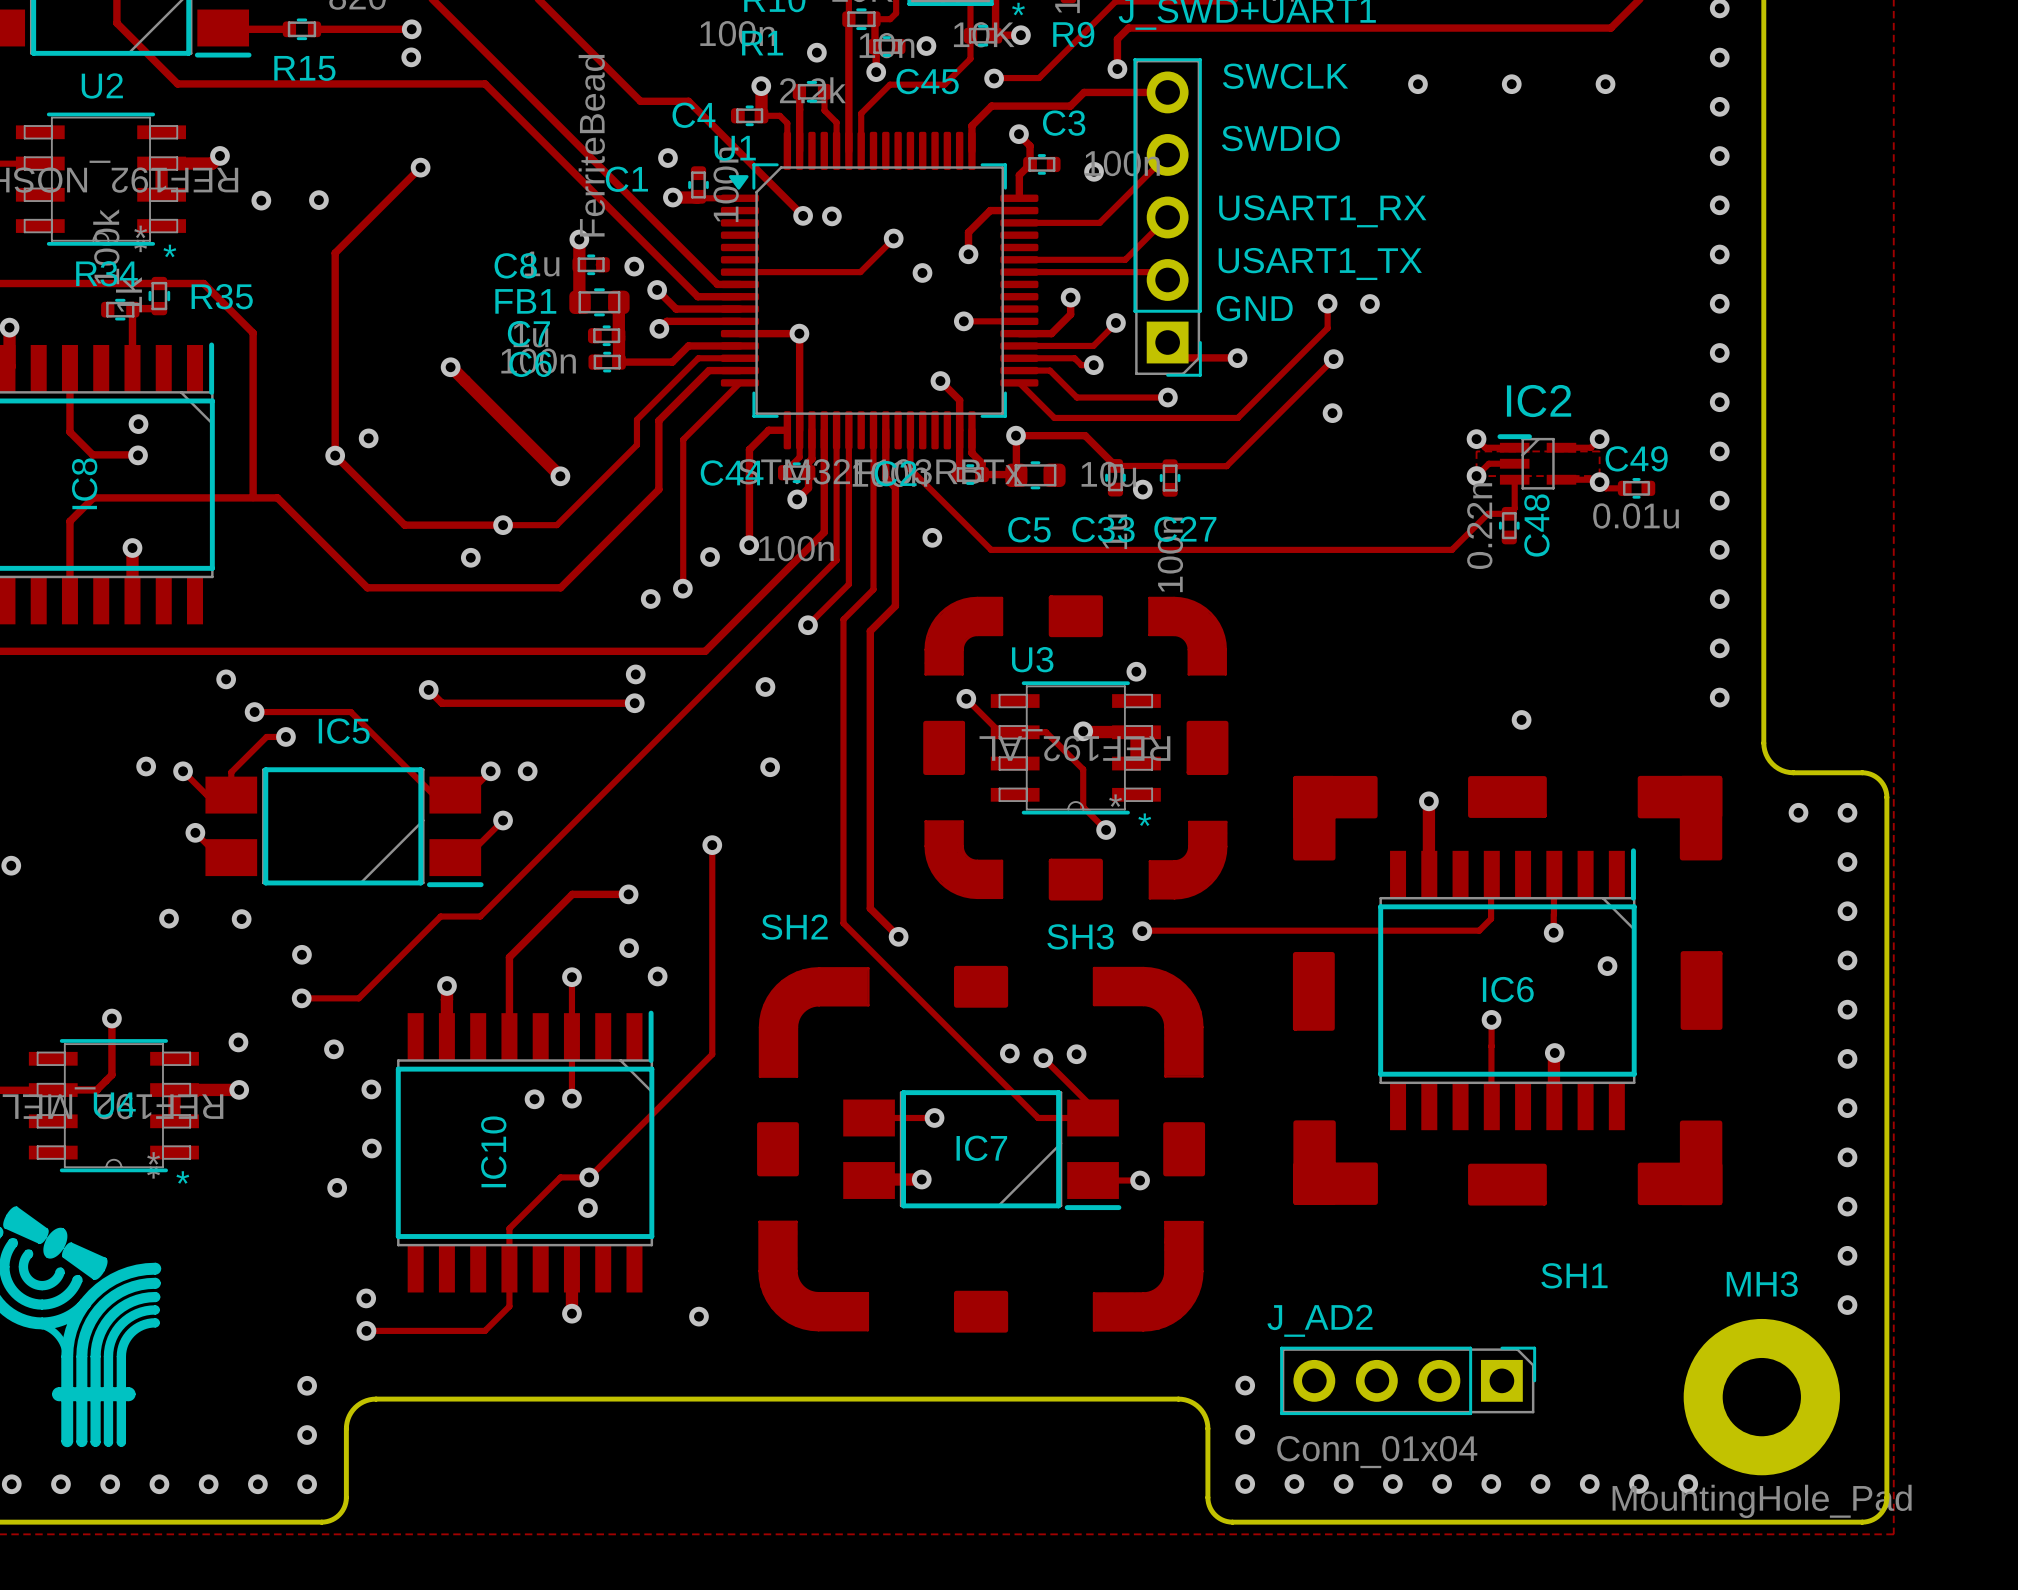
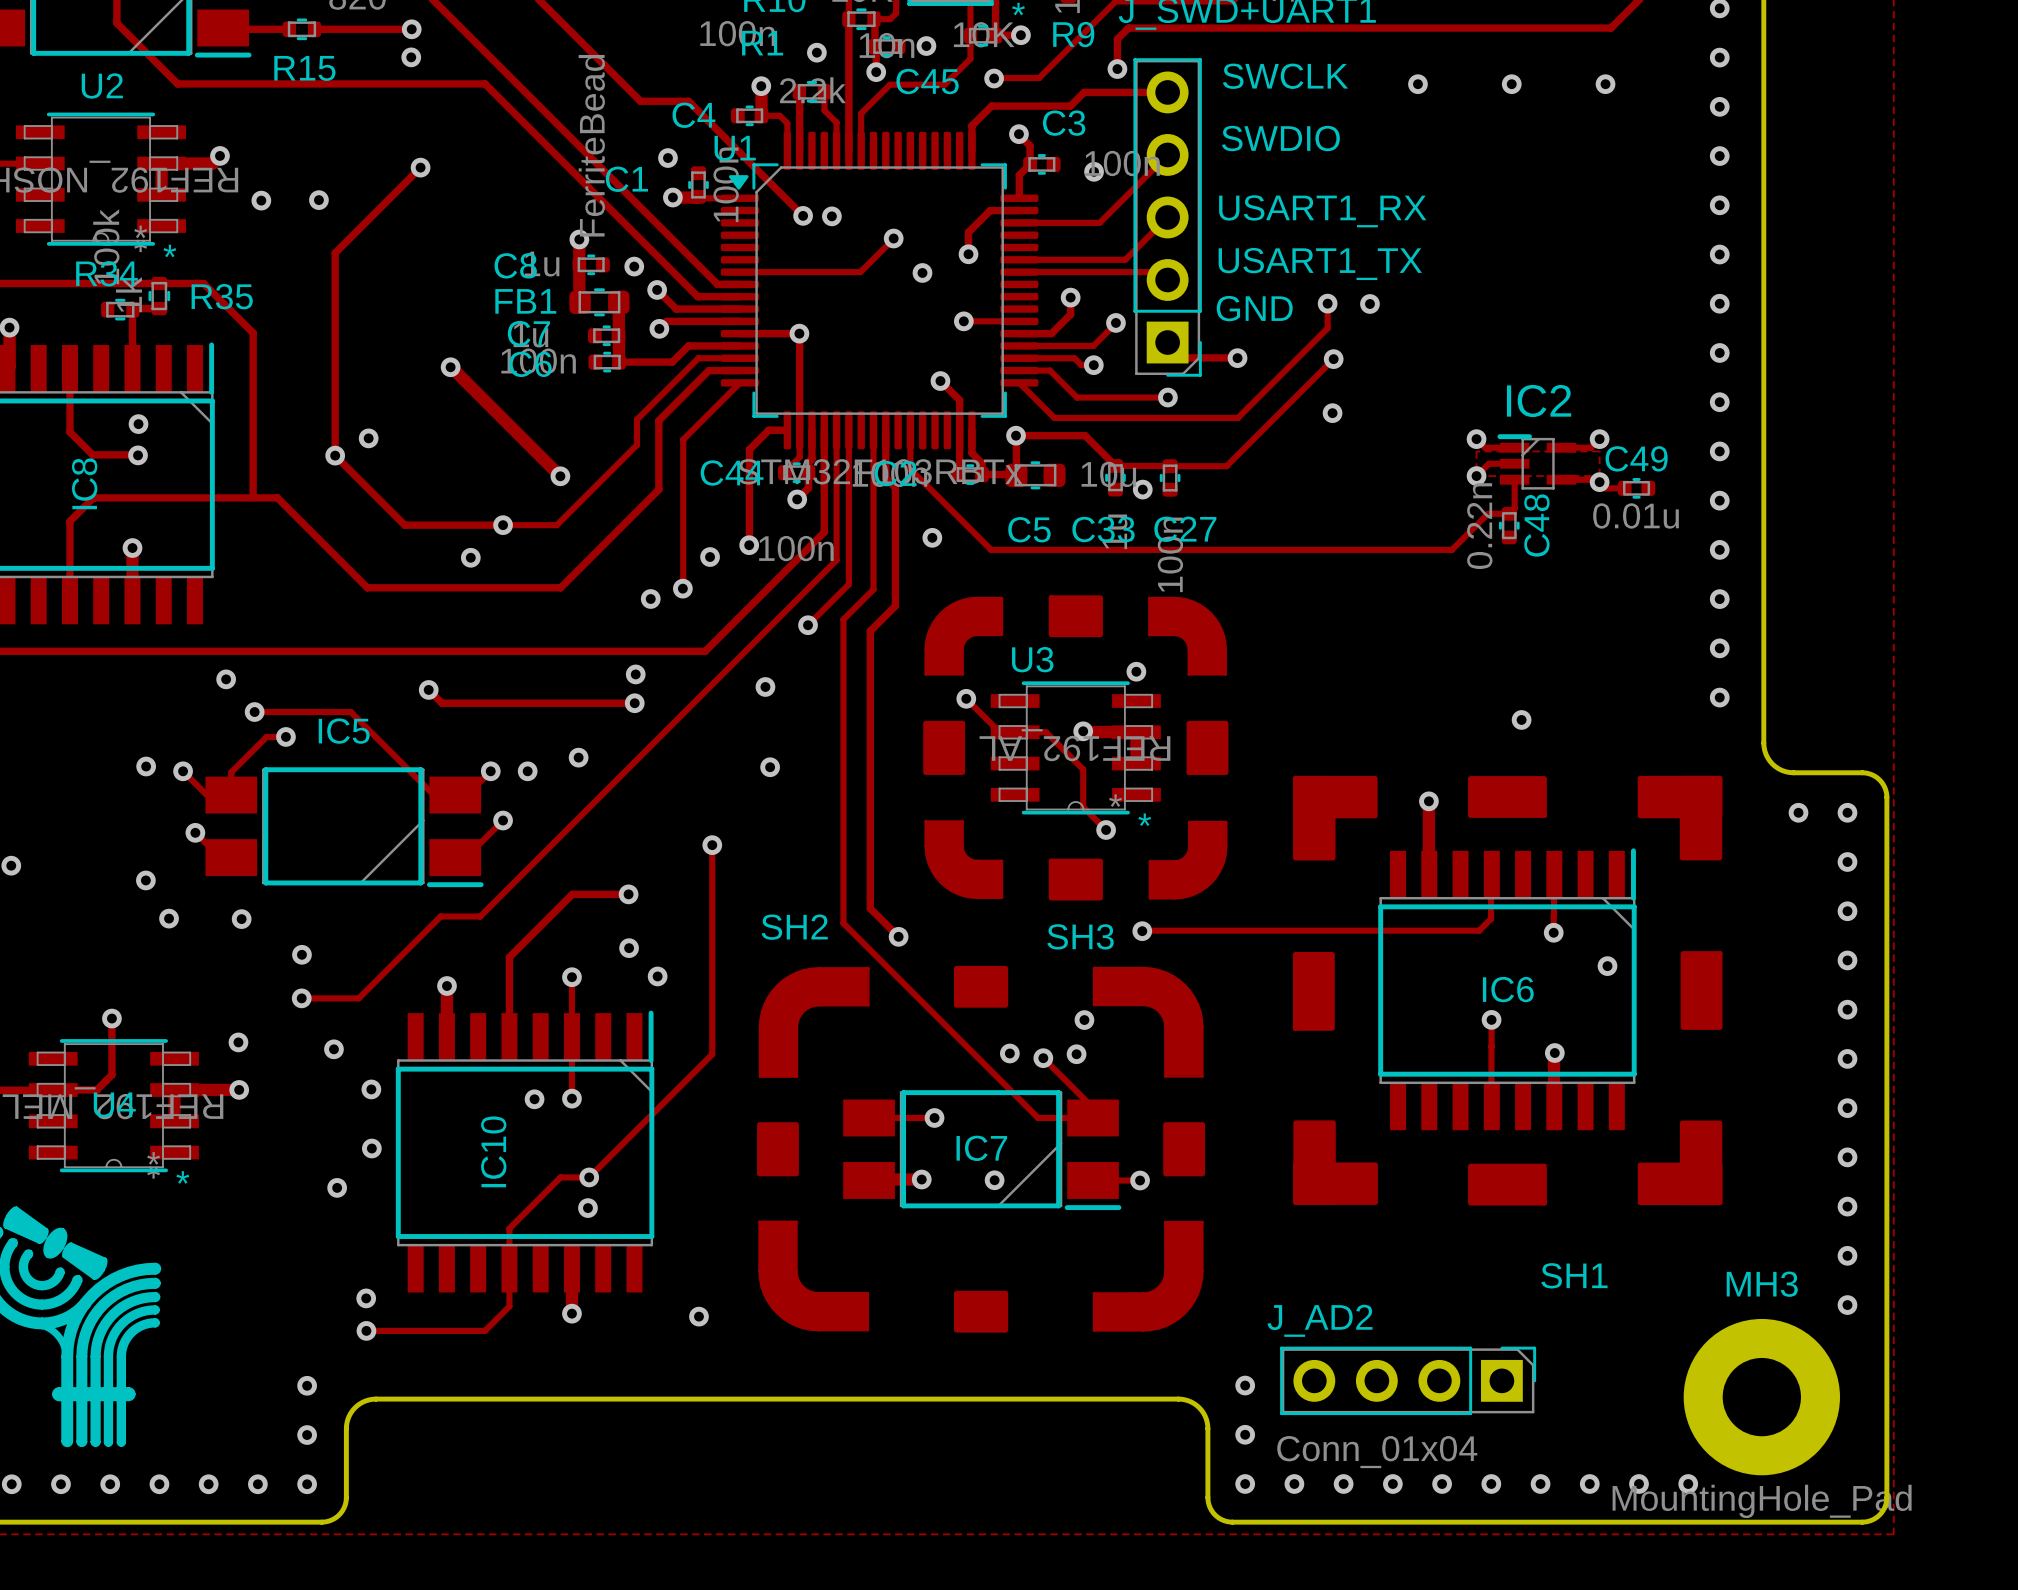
via: none -> (578, 757)
via: none -> (145, 880)
via: none -> (1084, 1020)
via: none -> (994, 1180)

